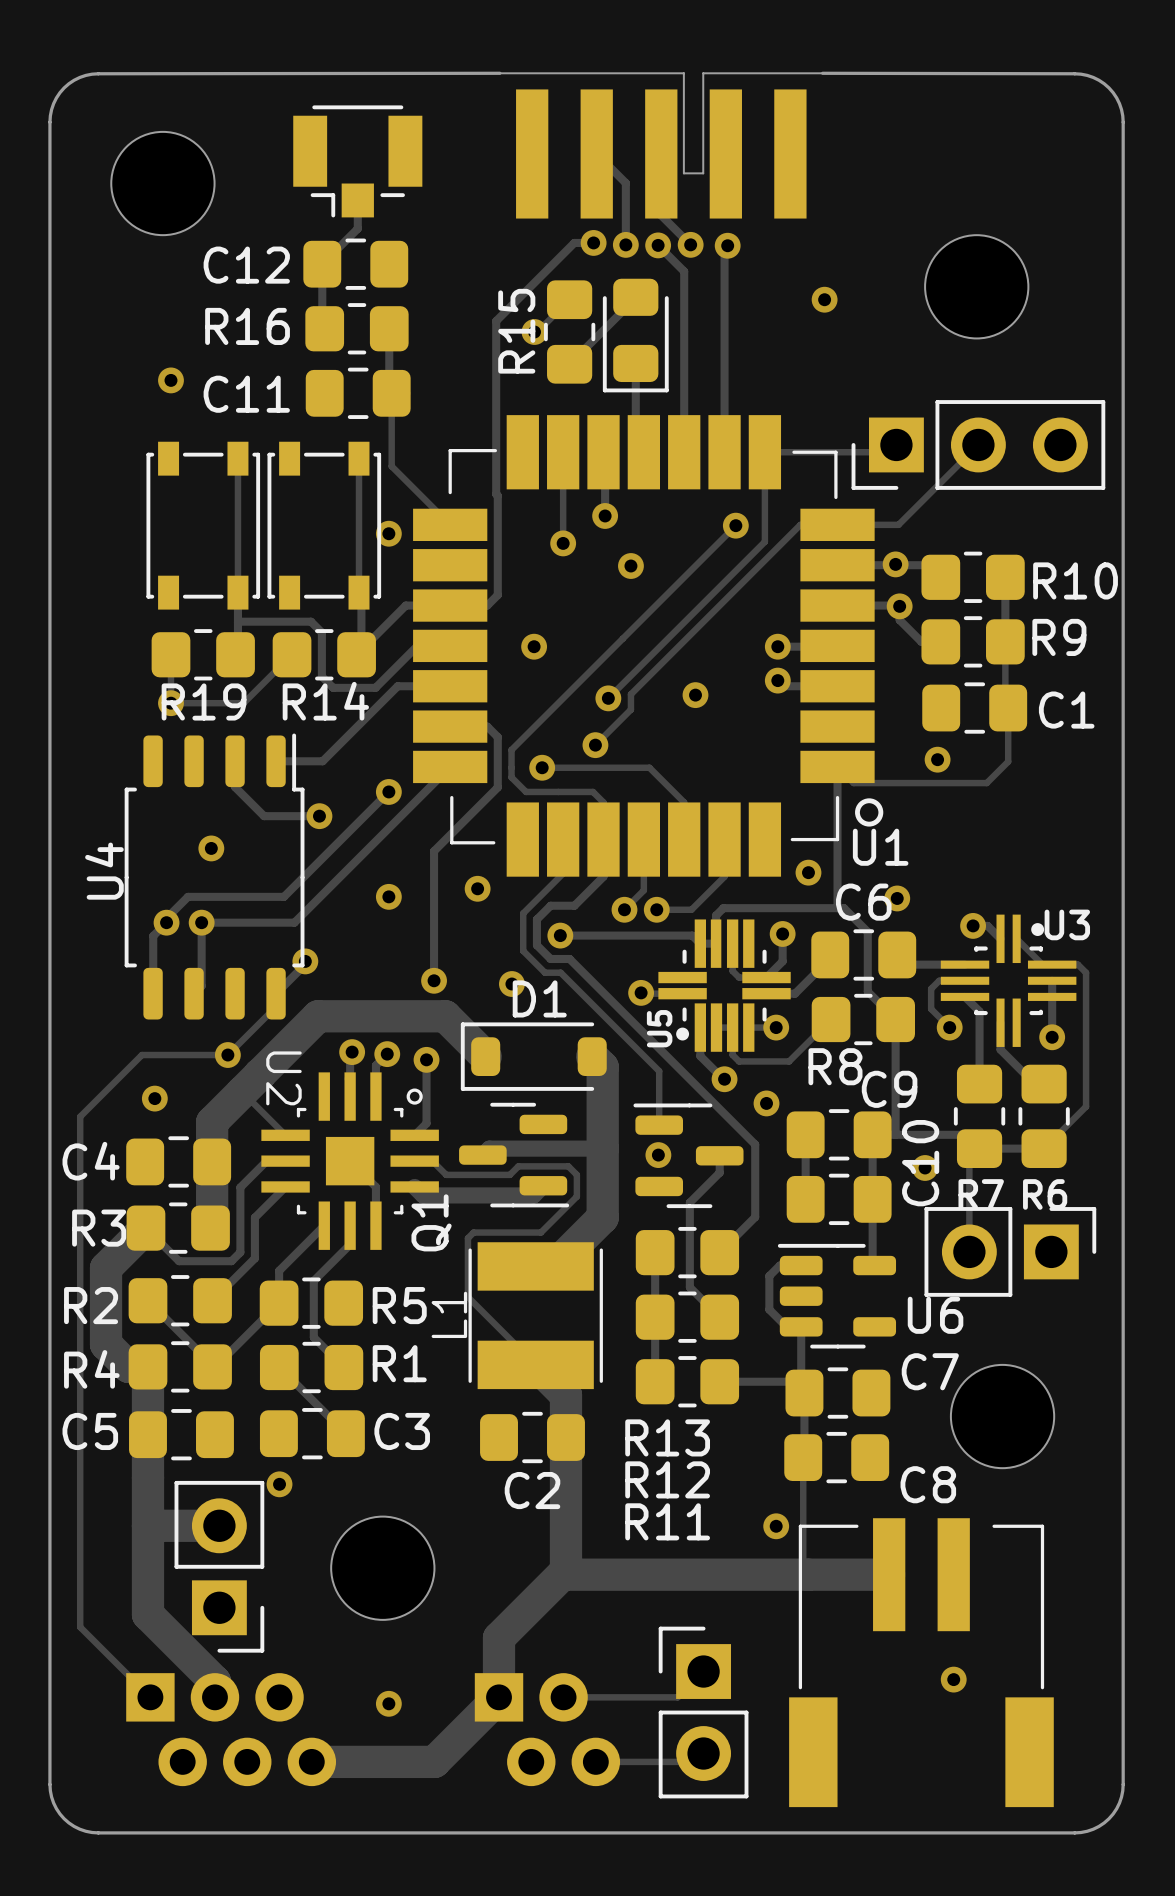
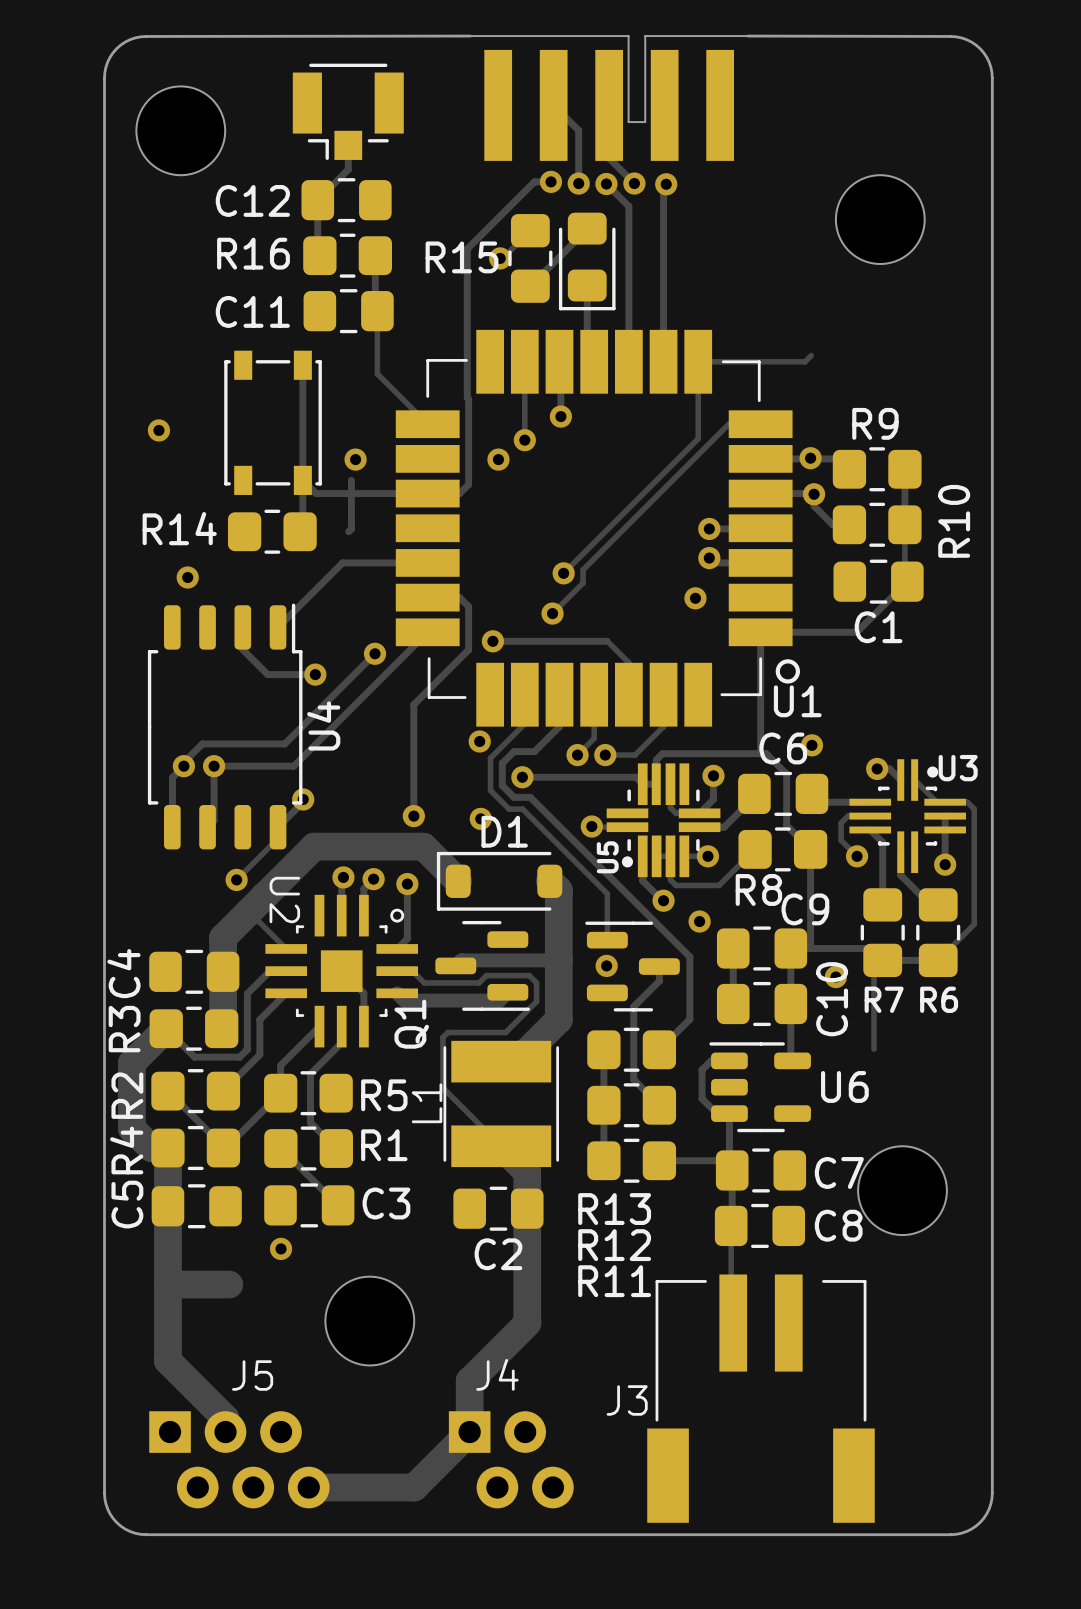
board edge: (822, 73) (1081, 74) (1098, 80) (1109, 87) (1116, 97) (1122, 115) (1123, 1784) (1121, 1797) (1113, 1813) (1098, 1826) (1081, 1832) (98, 1832) (85, 1831) (74, 1826) (64, 1818) (56, 1808) (51, 1797) (49, 1784) (49, 122) (51, 109) (56, 97) (64, 87) (74, 80) (92, 74) (122, 73) -> (747, 36) (956, 36) (971, 42) (980, 48) (986, 57) (991, 72) (992, 1493) (989, 1509) (983, 1518) (971, 1529) (956, 1534) (146, 1534) (125, 1529) (110, 1513) (104, 1493) (104, 78) (107, 62) (116, 48) (130, 39) (146, 36)
via: (824, 299) -> none
R15 name rotation: 0° (516, 331) -> 90° clockwise (462, 257)
via: (170, 380) -> none
track: (978, 444) (898, 524) (837, 524) -> none
part: (978, 444) -> none
track: none -> (302, 365) (302, 528) (300, 531)
track: (237, 458) (237, 652) (235, 654) -> none
track: (359, 458) (359, 592) -> none
part: none -> (273, 422)
part: (203, 525) -> none
part: (324, 525) -> none
track: (735, 525) (511, 749) (511, 777) (526, 791) (593, 791) (603, 802) (603, 839) -> none
via: (735, 525) -> none
via: none -> (158, 430)
via position: (388, 533) -> (355, 459)
via: none -> (498, 459)
via: (630, 566) -> none
R10 name rotation: 0° (1075, 580) -> 90° counterclockwise (954, 521)
track: (405, 605) (356, 654) -> (389, 493) (316, 493) (302, 480)
track: (237, 622) (311, 621) (321, 632) (321, 676) (333, 687) (375, 687) (417, 645) (450, 645) -> none
R9 name position: R9 (1059, 637) -> R9 (875, 423)
via: (534, 646) -> none
track: (170, 654) (170, 703) (243, 703) (292, 654) -> none
R19: (203, 654) -> none
R14 position: (324, 654) -> (272, 531)
track: (397, 686) (322, 761) (276, 761) -> (382, 562) (342, 562) (278, 627)
via position: (695, 695) -> (695, 598)
R14 name position: R14 (325, 701) -> R14 (179, 528)
track: (1008, 708) (1008, 761) (986, 783) (853, 783) (837, 766) -> (907, 581) (856, 632) (760, 632)
C1 name position: C1 (1066, 710) -> C1 (878, 627)
via: (937, 759) -> none
track: (542, 767) (649, 767) (659, 777) -> (492, 641) (607, 641)
via position: (542, 767) -> (492, 641)
via: (211, 848) -> none
U4 name position: U4 (104, 871) -> U4 (323, 726)
via: (808, 872) -> none
via position: (477, 888) -> (479, 741)
via: (388, 896) -> none
track: (227, 1055) (141, 1055) (80, 1116) (80, 1627) (150, 1697) -> none
via: (154, 1098) -> none
C4 name rotation: 0° (91, 1161) -> 90° counterclockwise (123, 973)
C10 name position: C10 (920, 1163) -> C10 (832, 999)
R3 name rotation: 0° (99, 1228) -> 90° counterclockwise (124, 1029)
part: (1010, 1251) -> none
R2 name rotation: 0° (91, 1305) -> 90° counterclockwise (127, 1095)
U6 name position: U6 (935, 1315) -> U6 (844, 1086)
R4 name rotation: 0° (91, 1369) -> 90° counterclockwise (126, 1150)
C7 name position: C7 (930, 1371) -> C7 (839, 1172)
C5 name rotation: 0° (90, 1431) -> 90° counterclockwise (127, 1204)
C8 name position: C8 (928, 1484) -> C8 (838, 1225)
via: (776, 1526) -> none
part: (219, 1566) -> none
track: (570, 1574) (889, 1574) -> none
J4 name: none -> J4 (497, 1374)
J5 name: none -> J5 (252, 1375)
J3: none -> (761, 1398)
part: (921, 1662) -> none
track: (703, 1671) (677, 1697) (563, 1697) -> none
via: (953, 1679) -> none
via: (388, 1703) -> none
part: (703, 1712) -> none
track: (703, 1753) (695, 1761) (595, 1761) -> none

